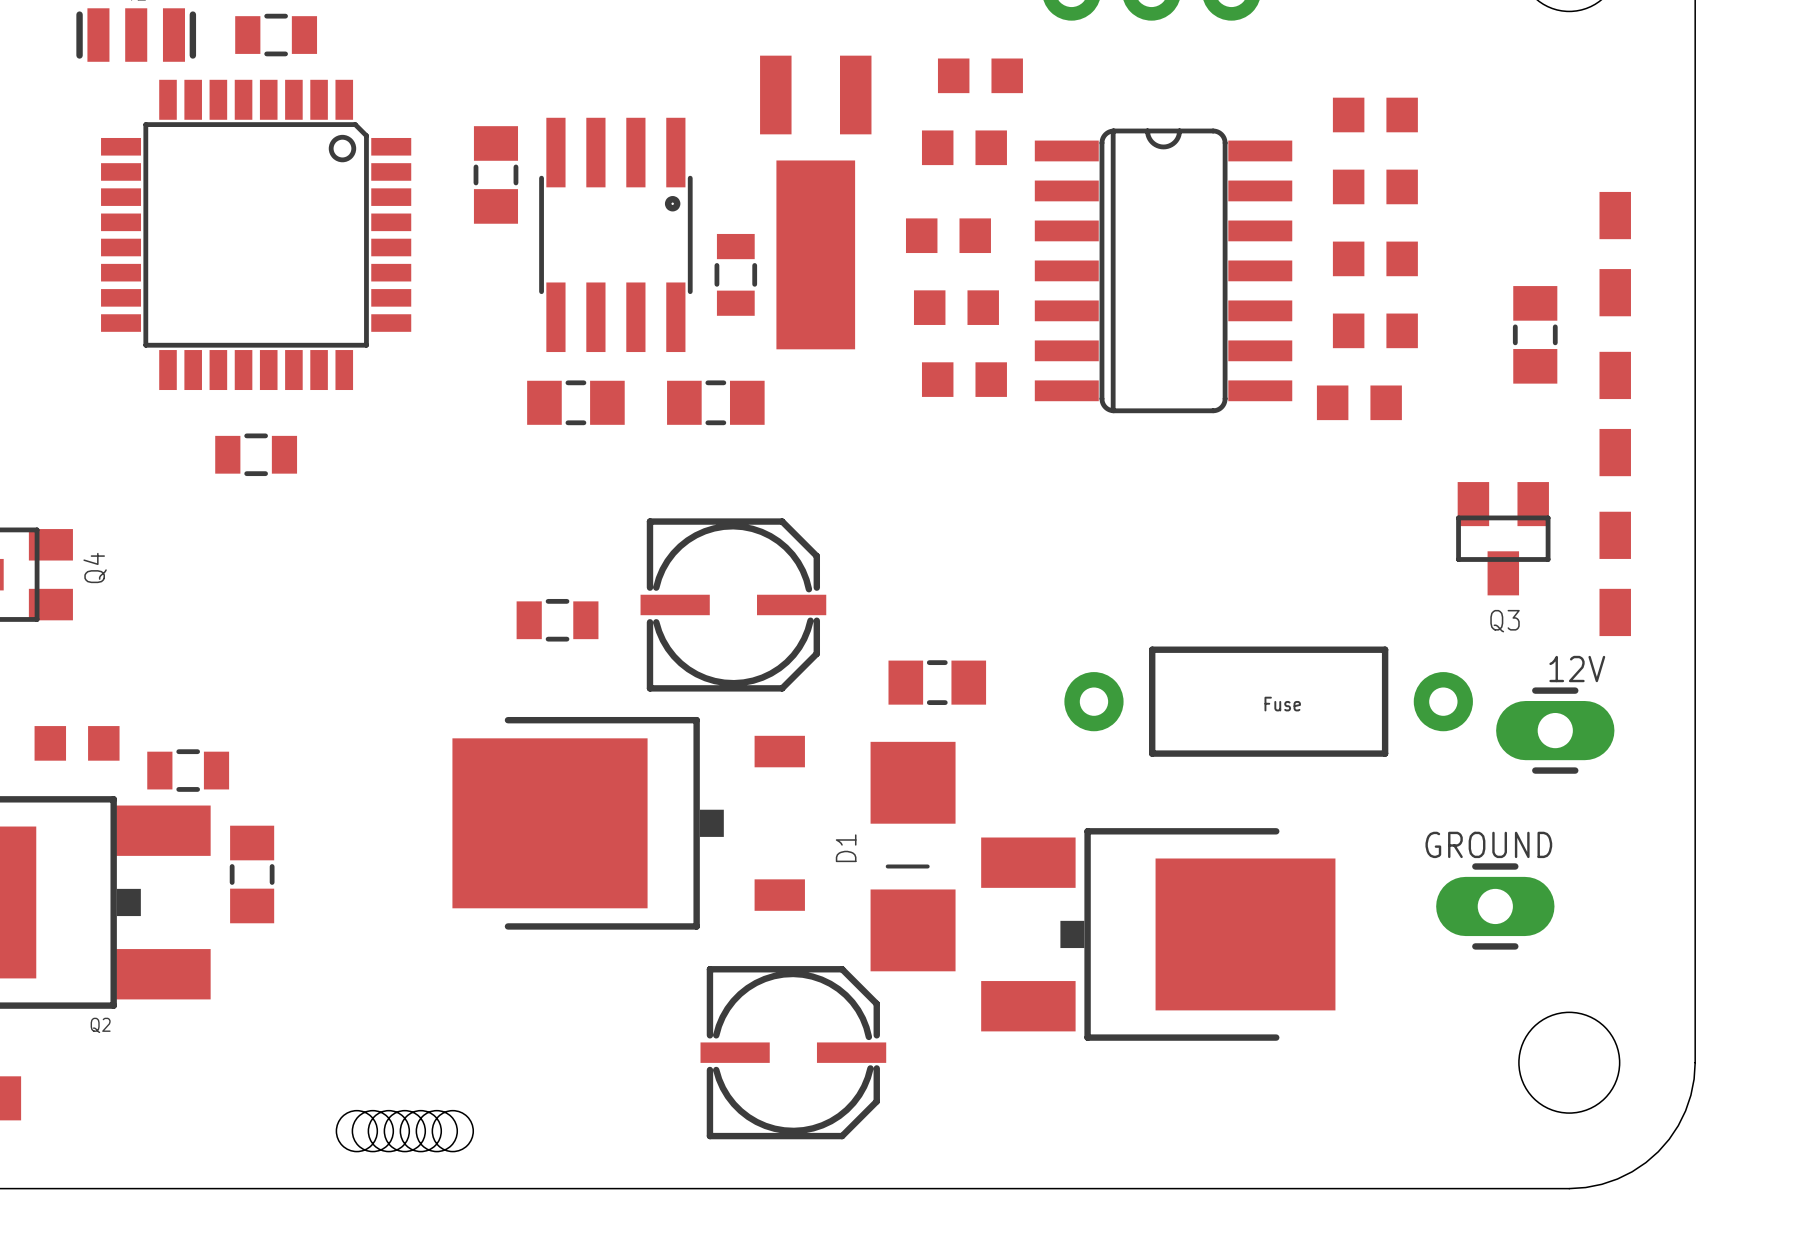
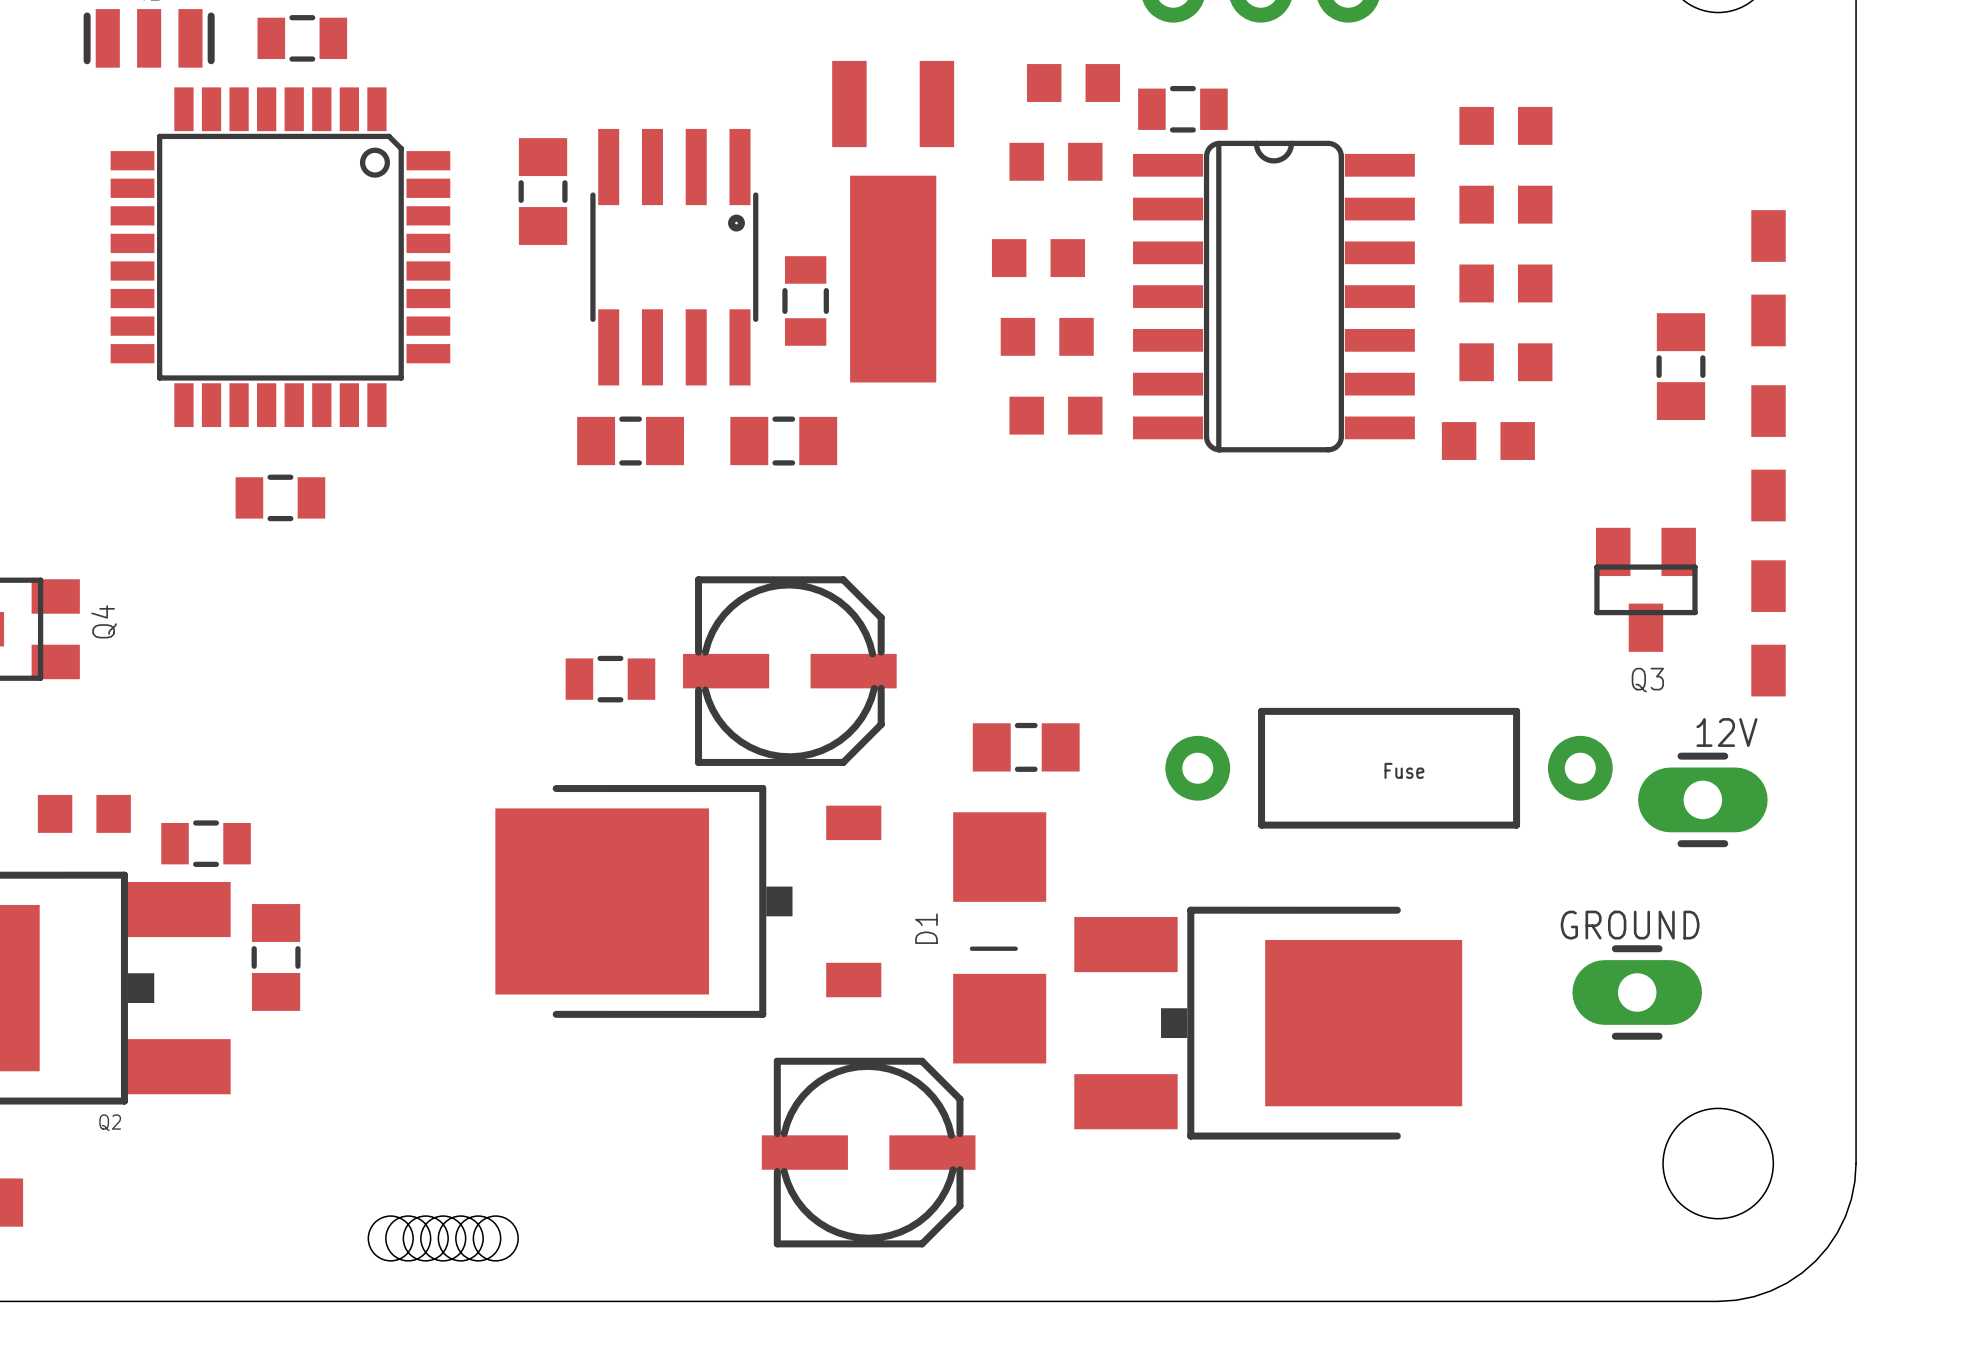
part: none -> (1182, 109)
part footprint: [640, 518, 827, 692] -> [683, 576, 897, 766]
part footprint: [700, 966, 887, 1140] -> [761, 1057, 976, 1248]

